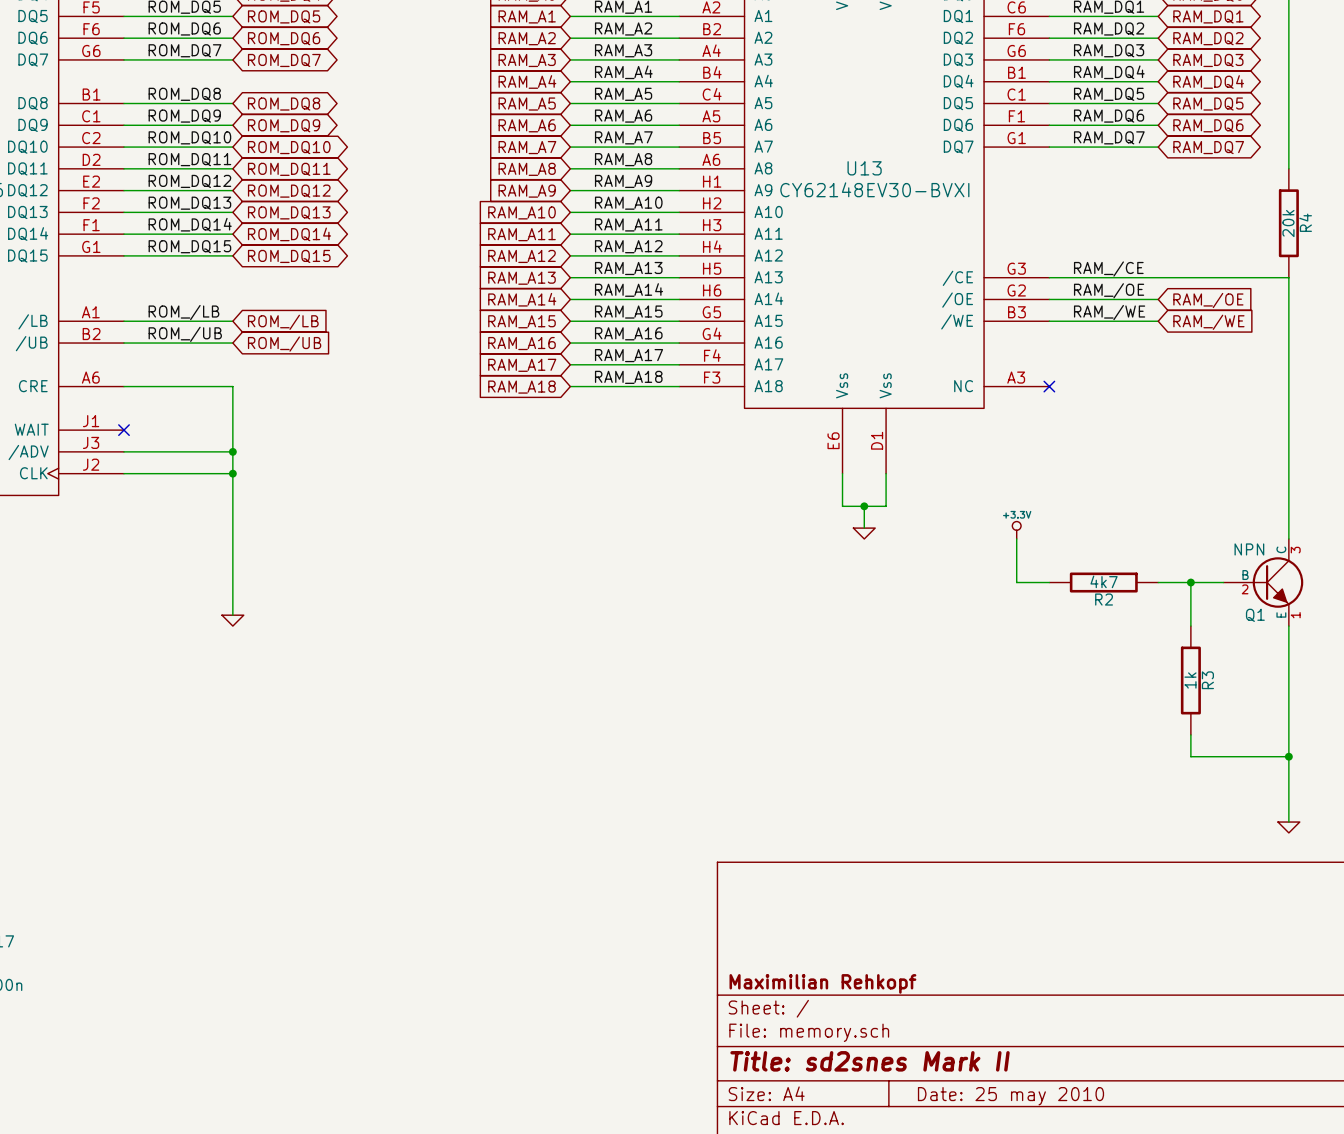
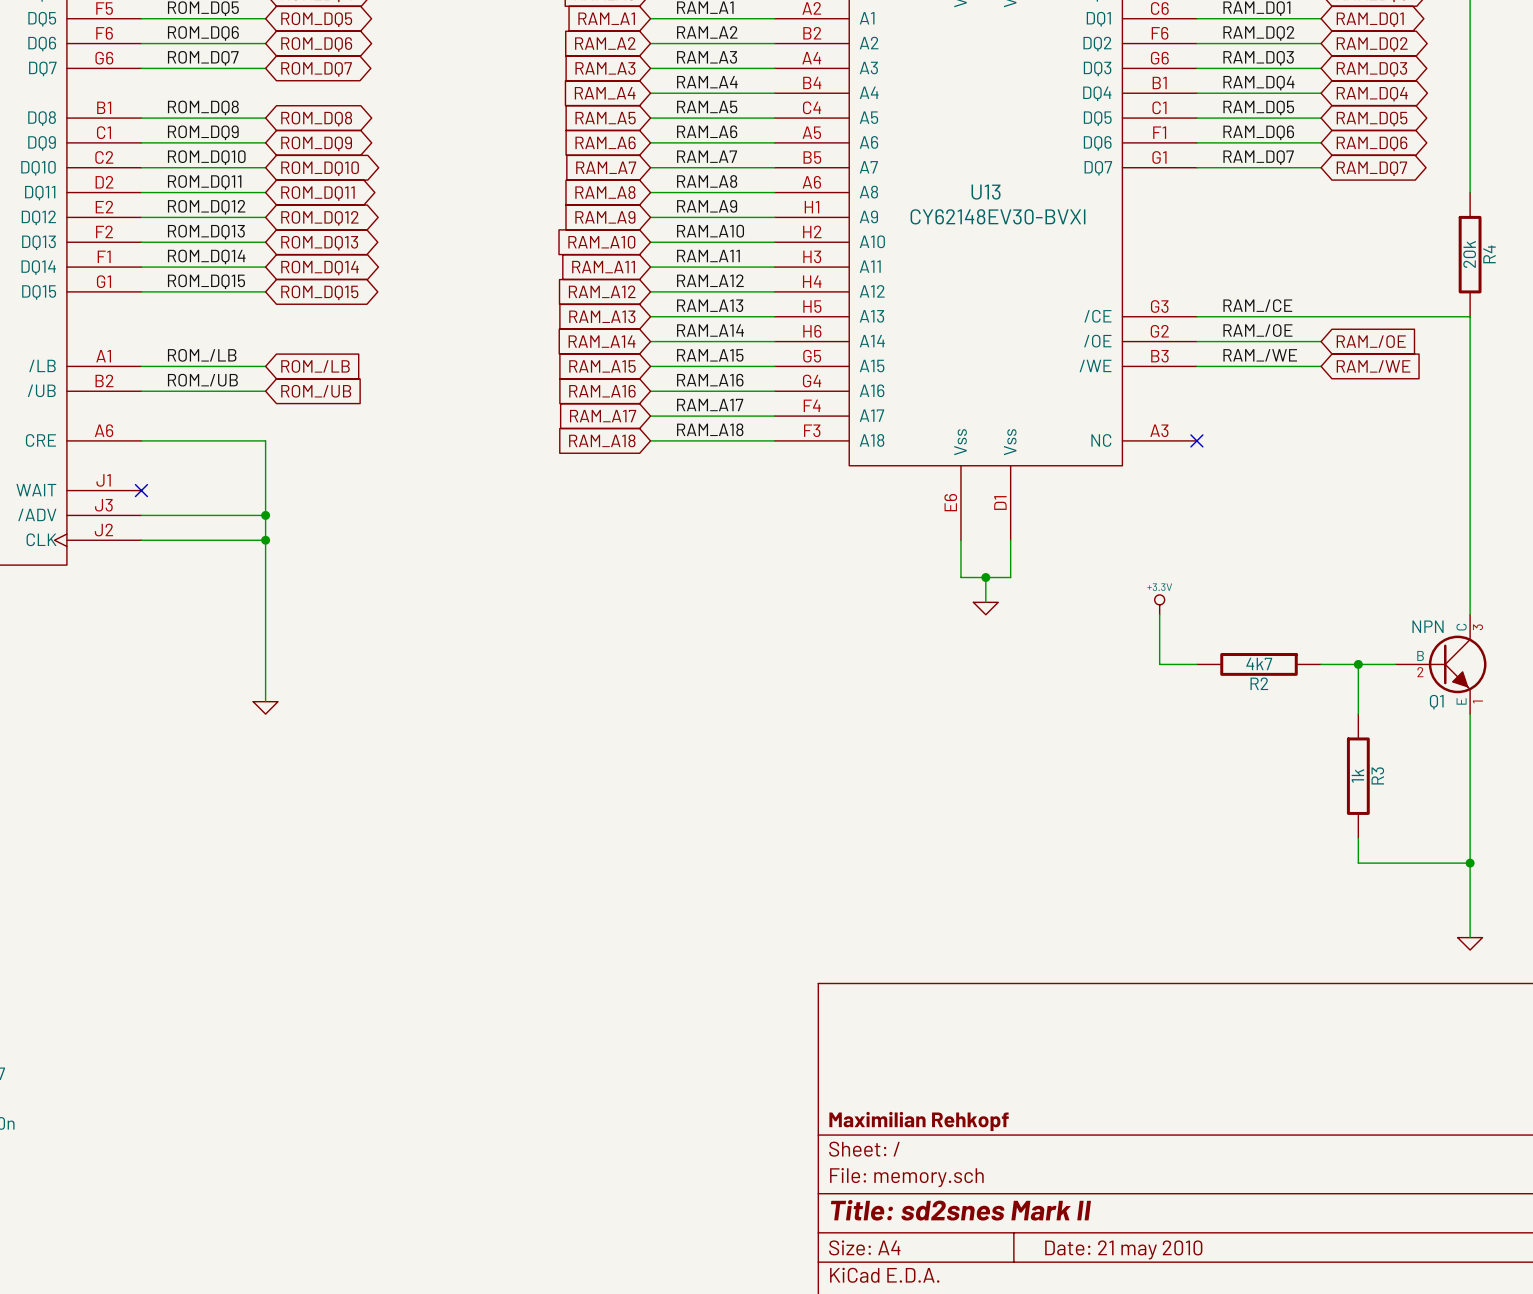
title block: Date: 25 may 2010 (1010, 1096) -> Date: 21 may 2010 (1123, 1249)

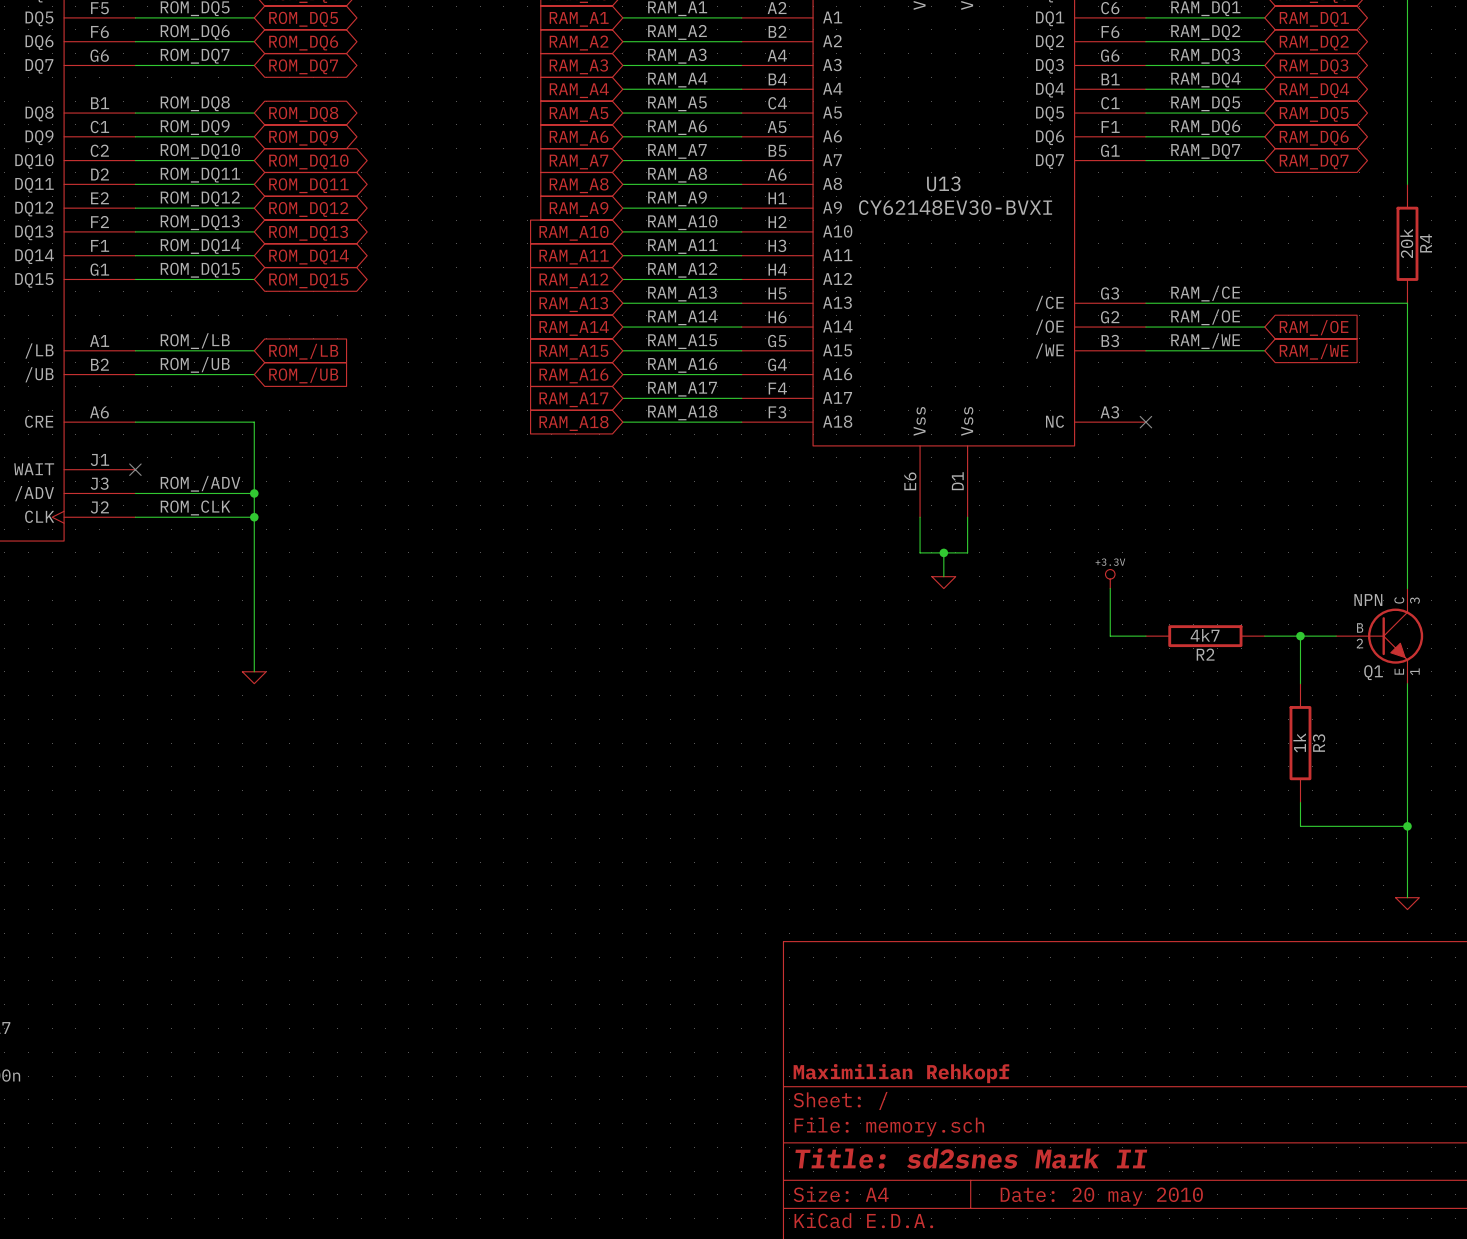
label: none -> ROM_/ADV (200, 483)
label: none -> ROM_CLK (195, 507)
title block: Date: 21 may 2010 (1123, 1249) -> Date: 20 may 2010 (1101, 1196)

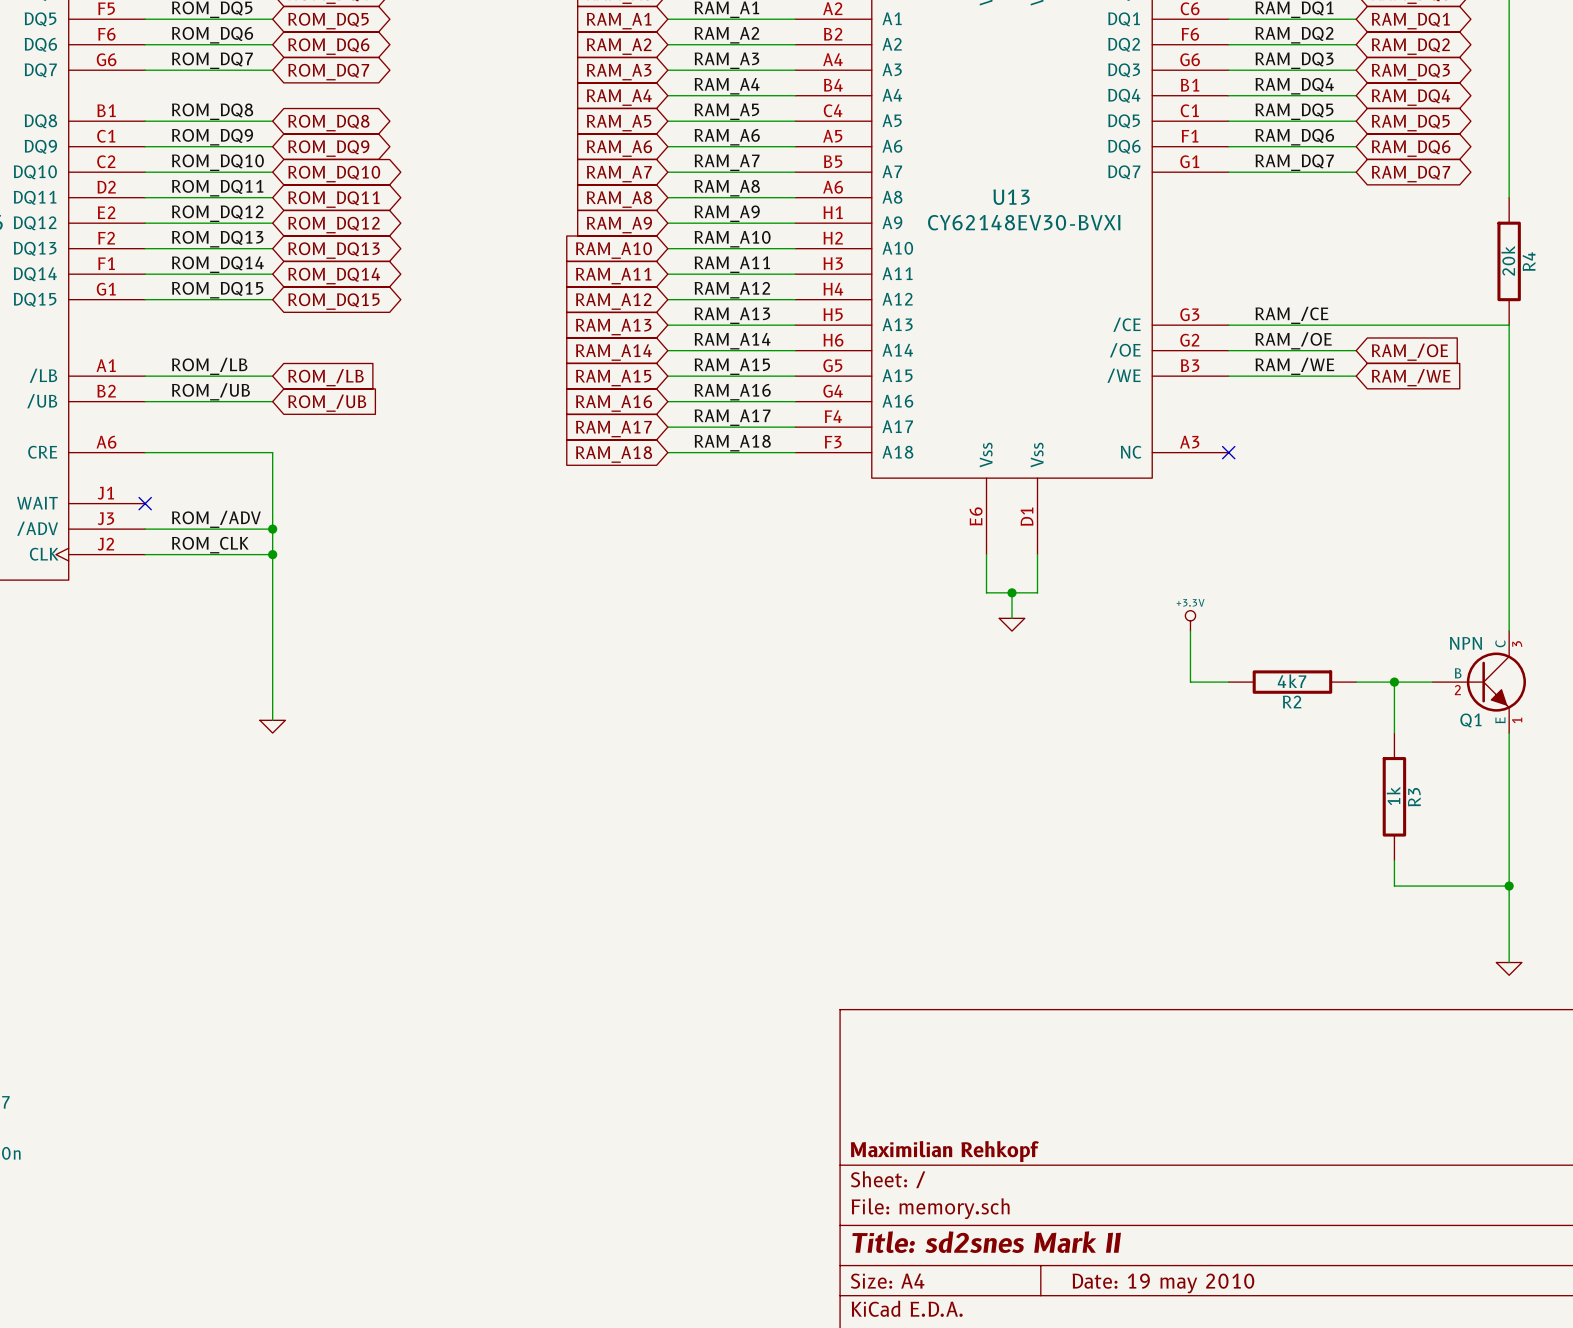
title block: Date: 20 may 2010 (1101, 1196) -> Date: 19 may 2010 (1163, 1283)

